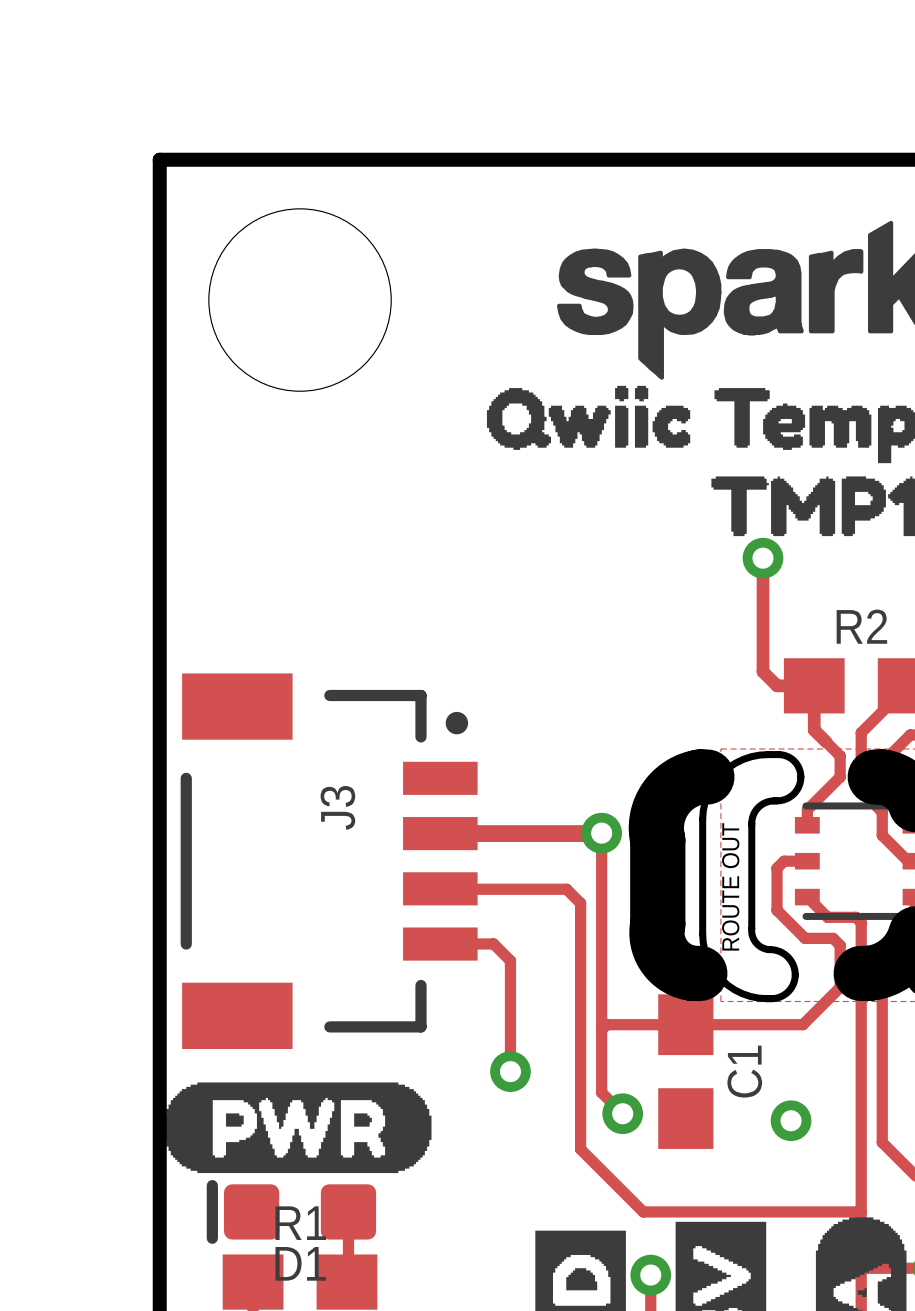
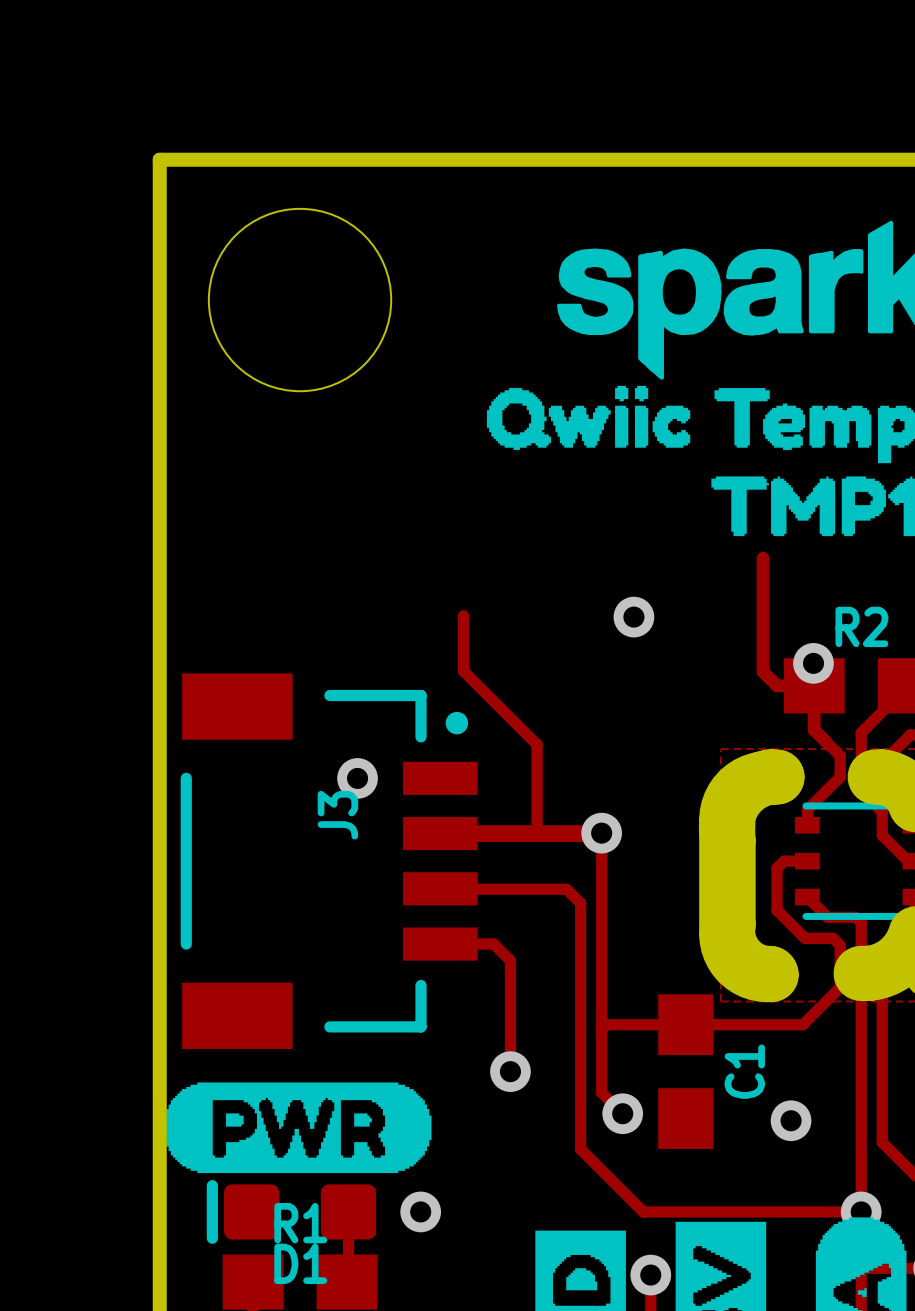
via: (763, 558) -> none
track: none -> (463, 615) (463, 671) (537, 744) (537, 833)
via: none -> (633, 617)
via: none -> (813, 663)
board edge: (706, 777) (688, 780) (672, 790) (659, 810) (656, 828) (658, 943) (664, 956) (674, 966) (688, 972) (699, 973) -> (777, 777) (758, 780) (743, 790) (729, 810) (726, 828) (728, 943) (734, 956) (745, 966) (758, 972) (770, 973)
via: none -> (357, 778)
via: none -> (420, 1211)
via: none -> (861, 1211)

